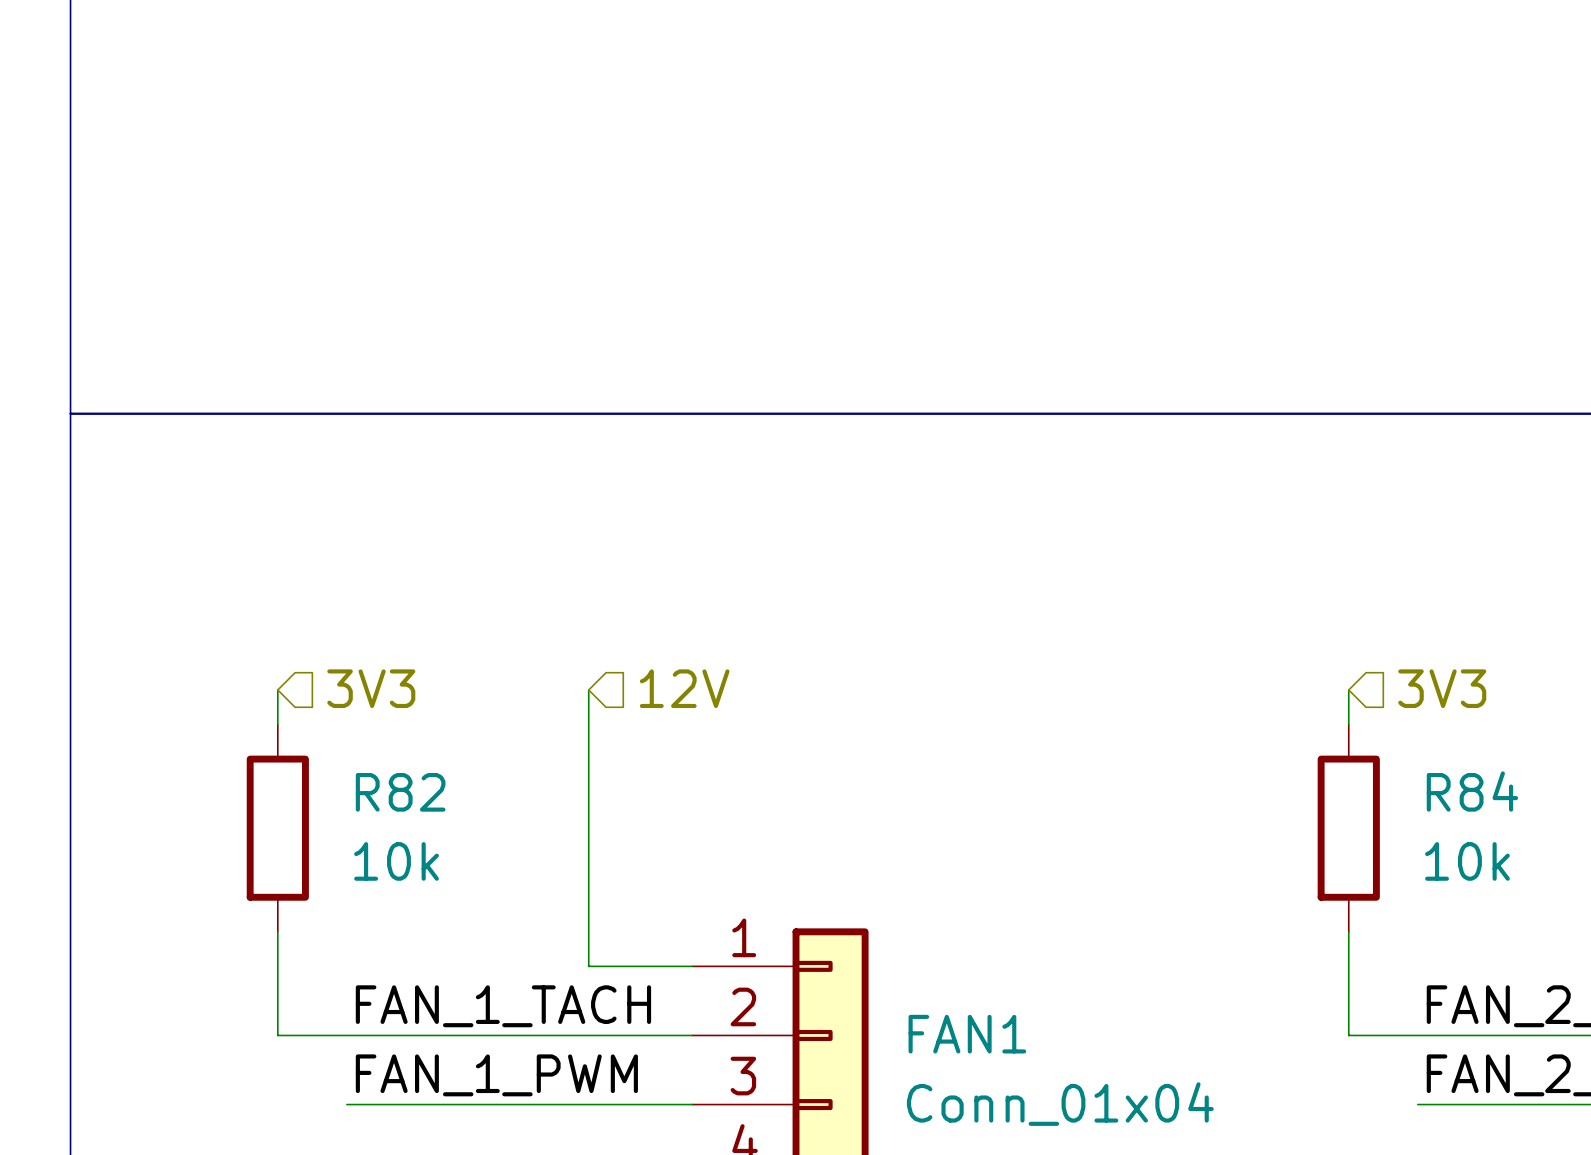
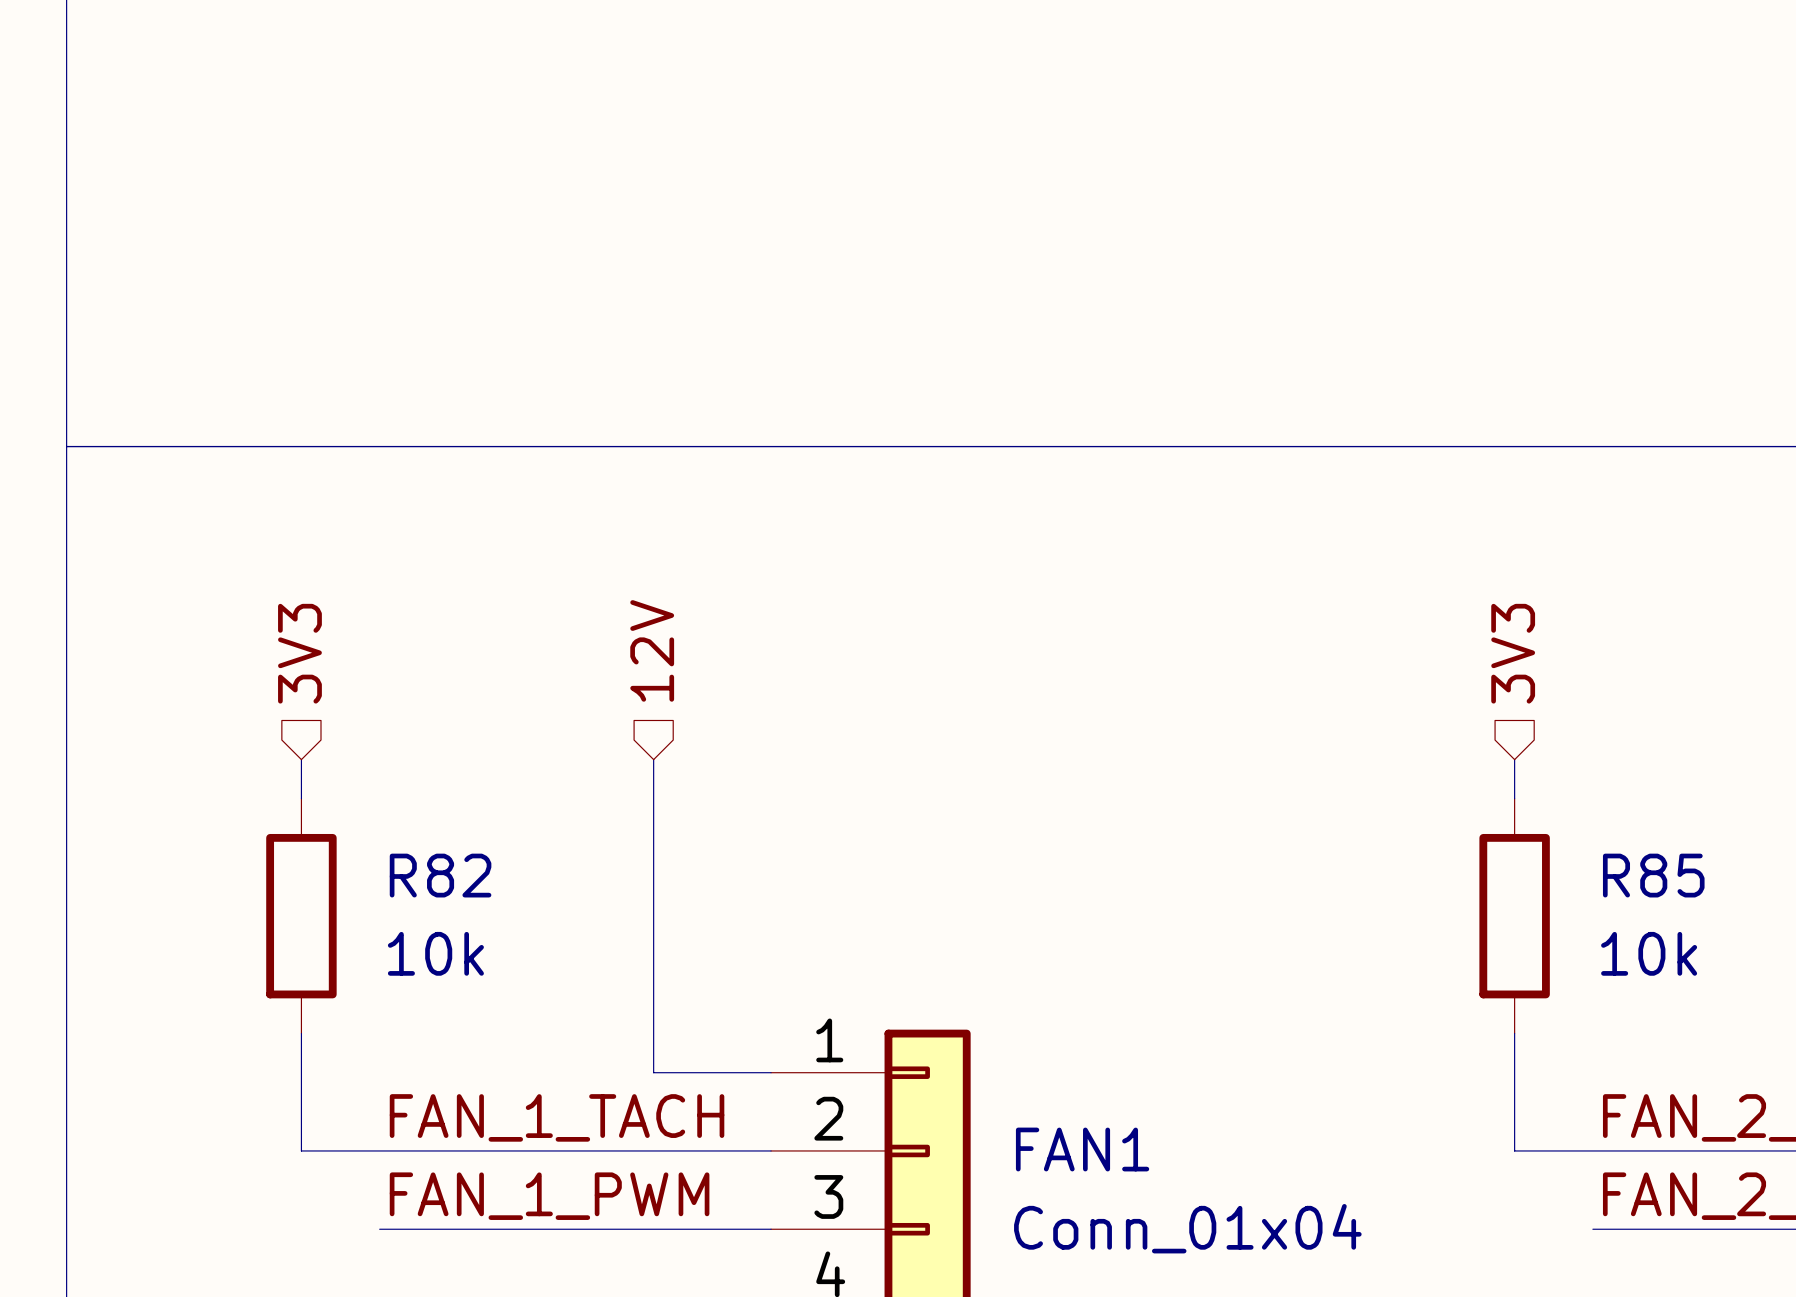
hierarchical label rotation: 0° (371, 688) -> 90° counterclockwise (299, 653)
hierarchical label position: 3V3 (371, 688) -> 3V3 (299, 653)
hierarchical label rotation: 0° (684, 688) -> 90° counterclockwise (652, 650)
hierarchical label position: 12V (684, 688) -> 12V (652, 650)
hierarchical label rotation: 0° (1442, 688) -> 90° counterclockwise (1513, 653)
hierarchical label position: 3V3 (1442, 688) -> 3V3 (1513, 653)
R84 name: R84 (1472, 791) -> R85 (1653, 875)

